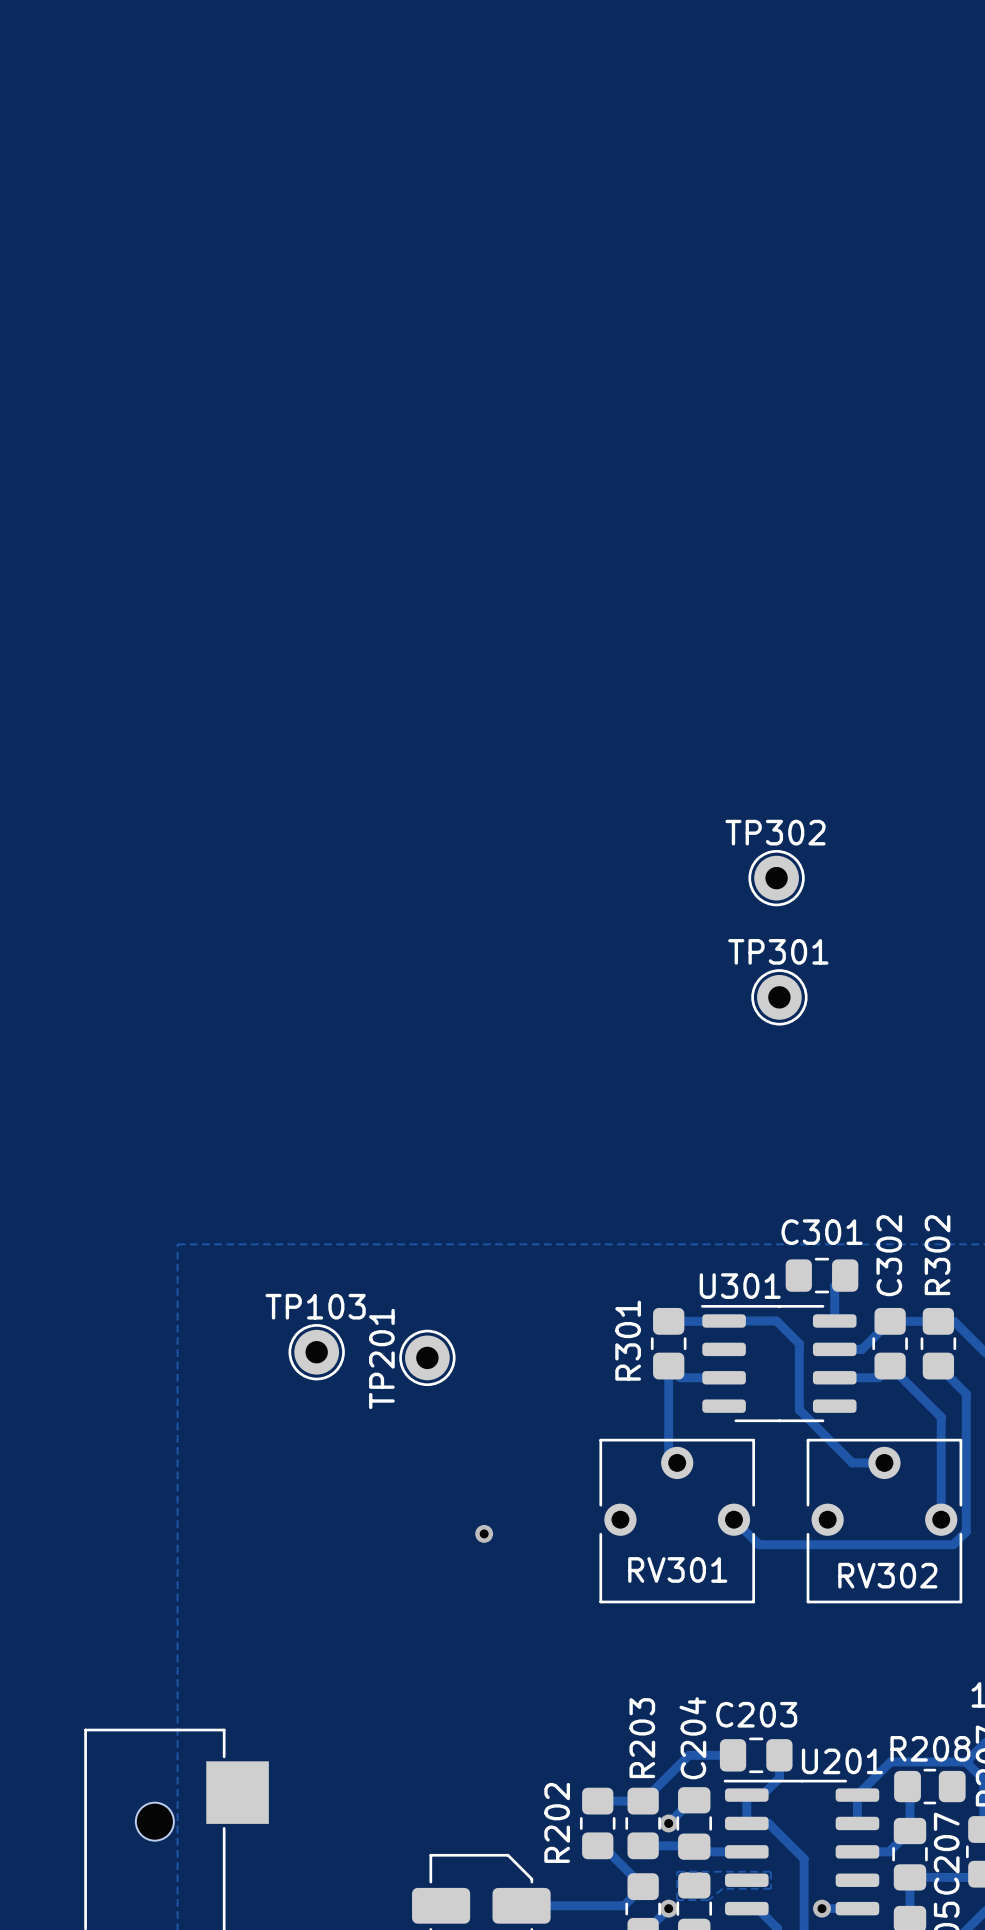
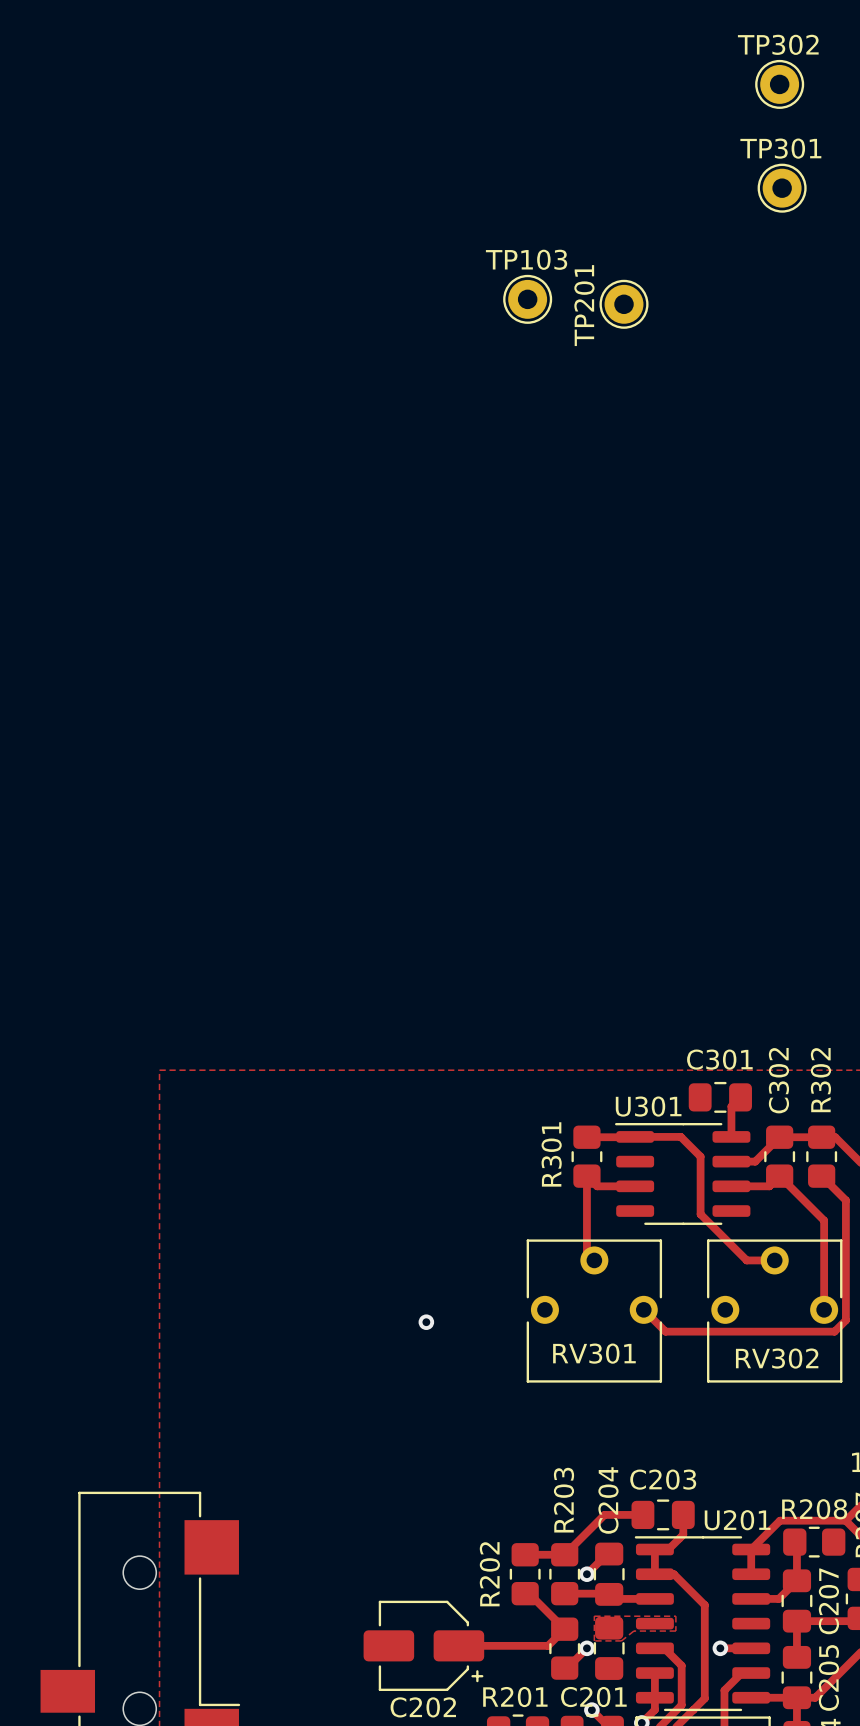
TP302 position: (776, 878) -> (779, 84)
TP301 position: (779, 997) -> (782, 188)
TP103 position: (316, 1352) -> (527, 299)
TP201 position: (427, 1357) -> (624, 304)

